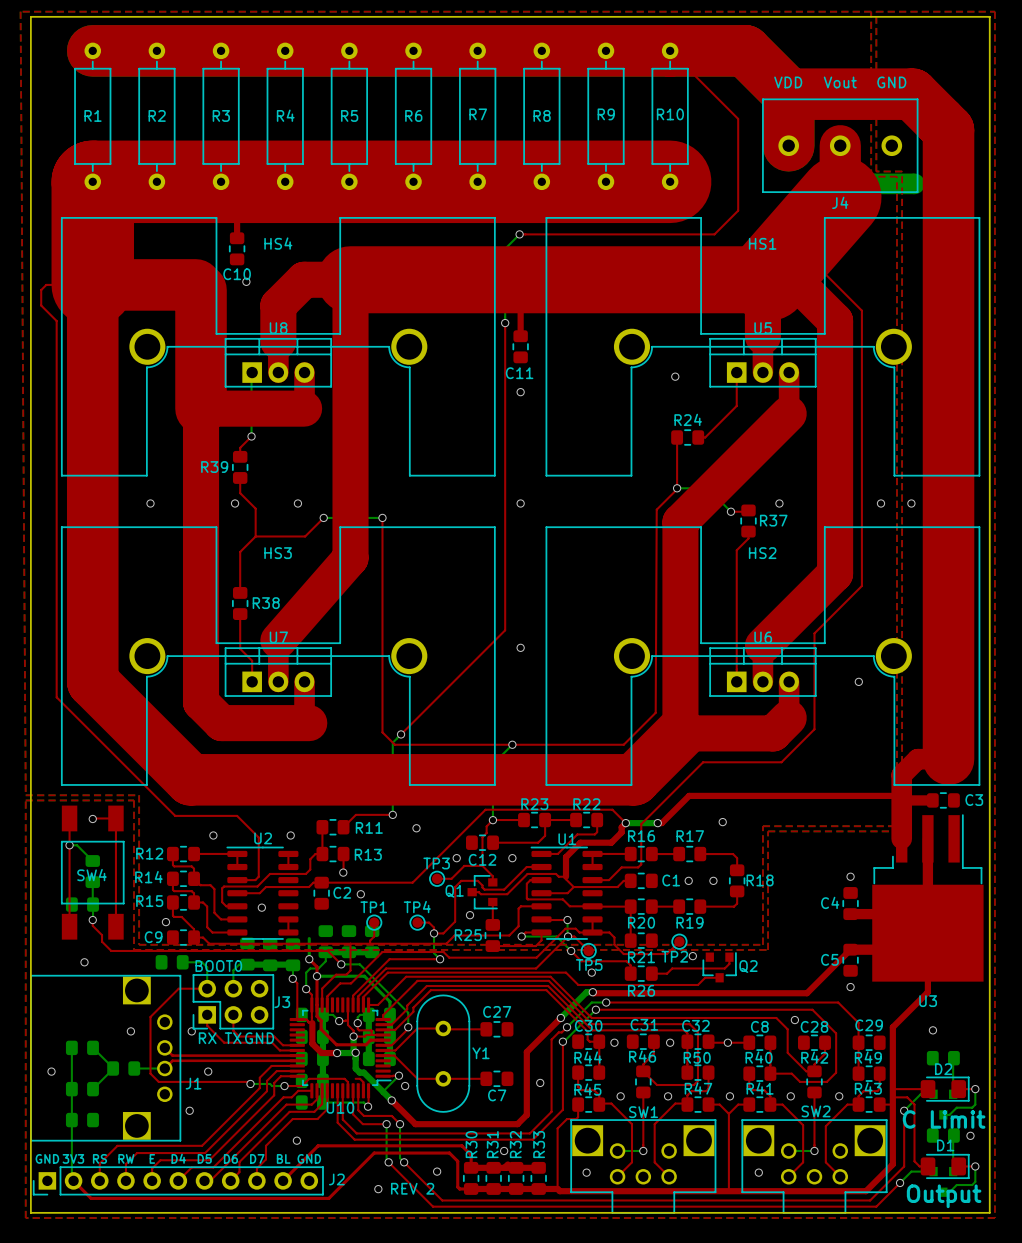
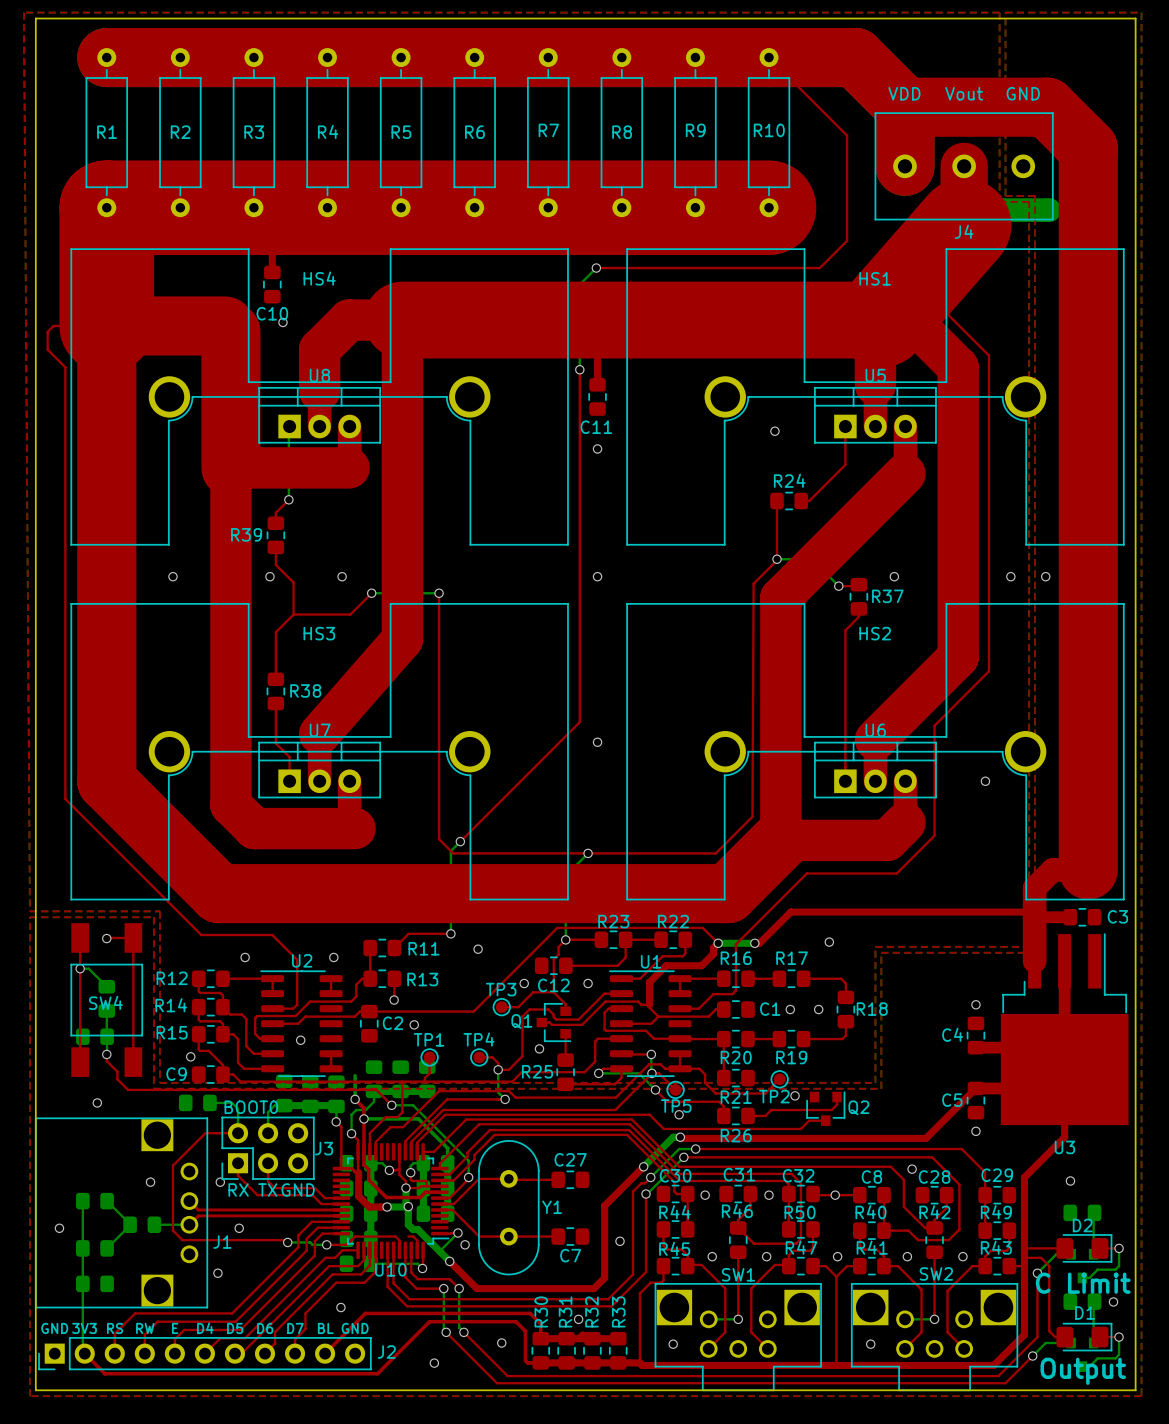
text: REV 2 (412, 1188) -> none

